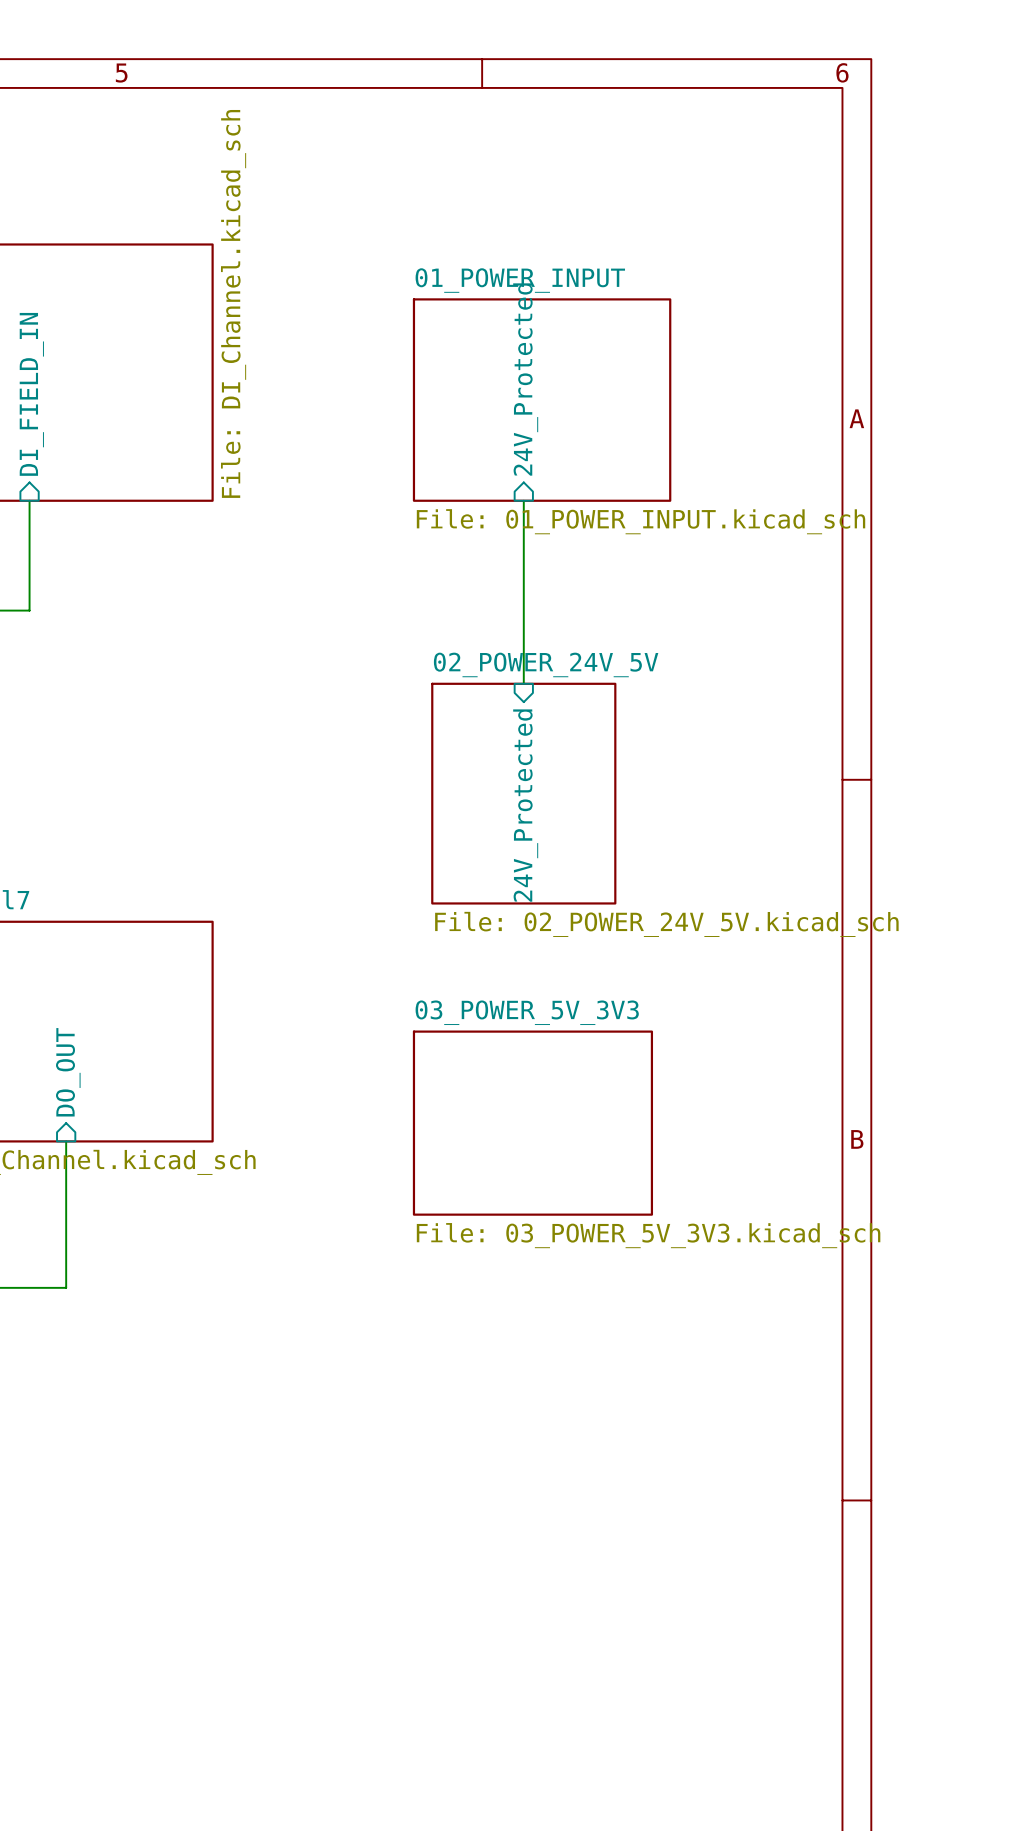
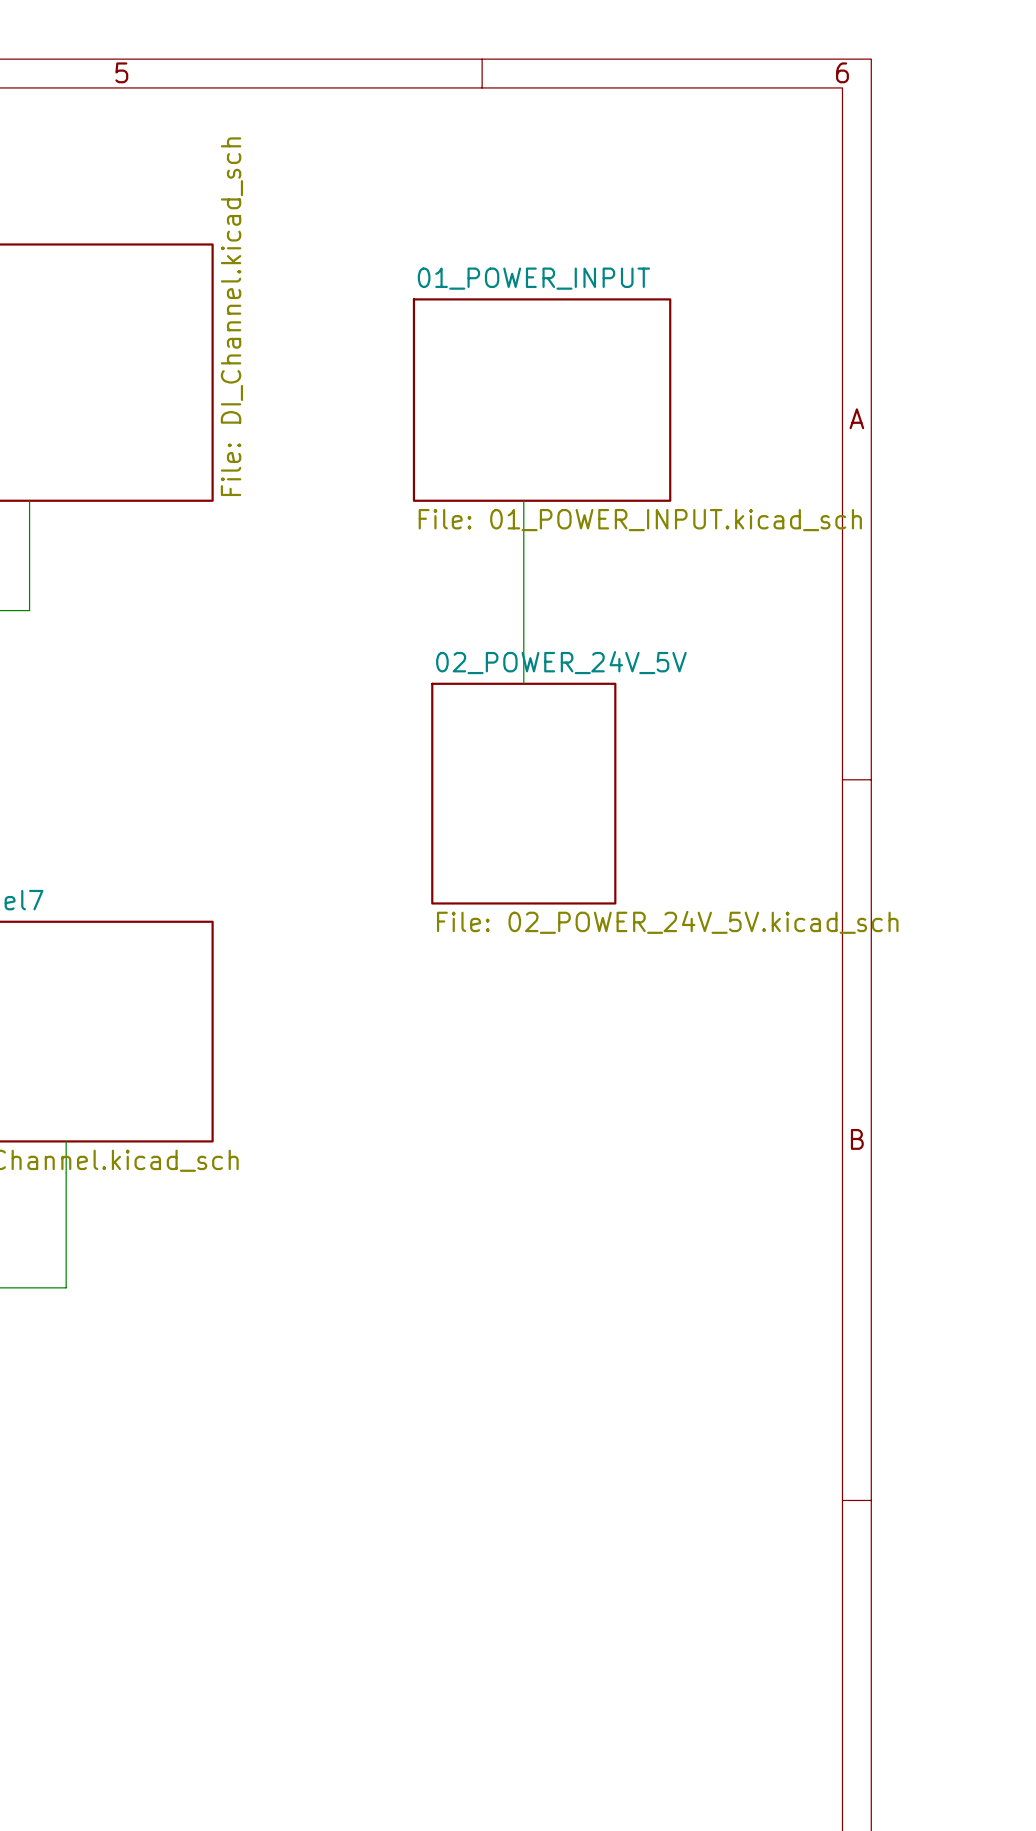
sheet pin: 24V_Protected (525, 379) -> none
sheet pin: DI_FIELD_IN (31, 394) -> none
sheet pin: 24V_Protected (525, 805) -> none
sheet pin: DO_OUT (68, 1072) -> none
sheet 03_POWER_5V_3V3: File: 03_POWER_5V_3V3.kicad_sch (532, 1123) -> none

